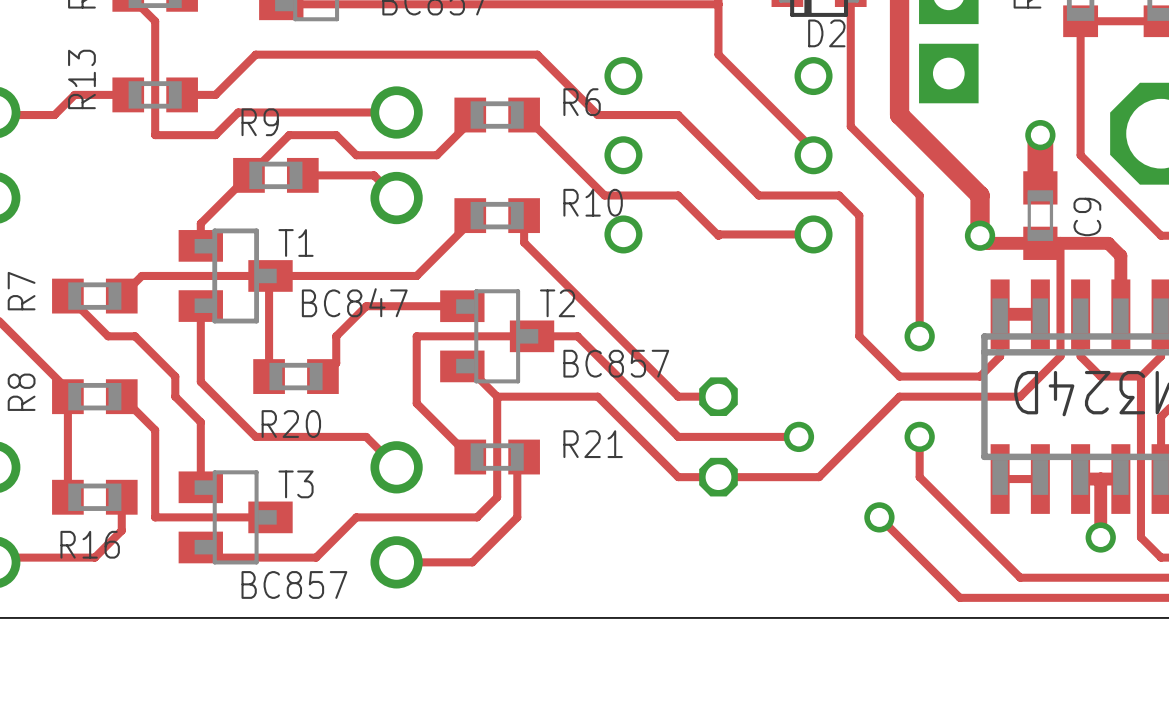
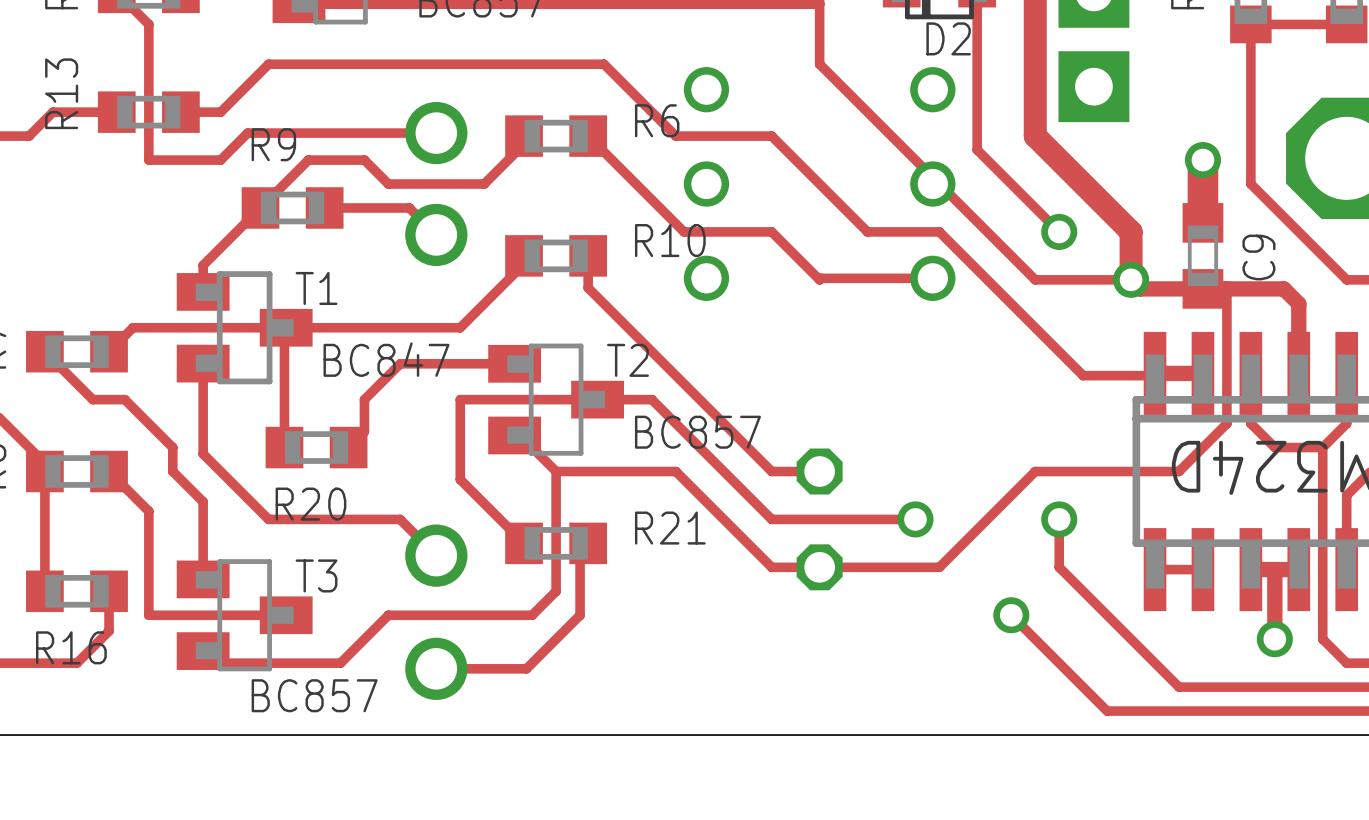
track: none -> (932, 177) (1035, 279) (1131, 279)
track: (819, 195) (839, 195) (859, 215) (859, 336) (899, 376) (980, 376) (1000, 356) (1000, 314) -> (939, 231) (1083, 375) (1152, 375)
track: (919, 195) (919, 336) -> none
via position: (919, 336) -> (1059, 231)

